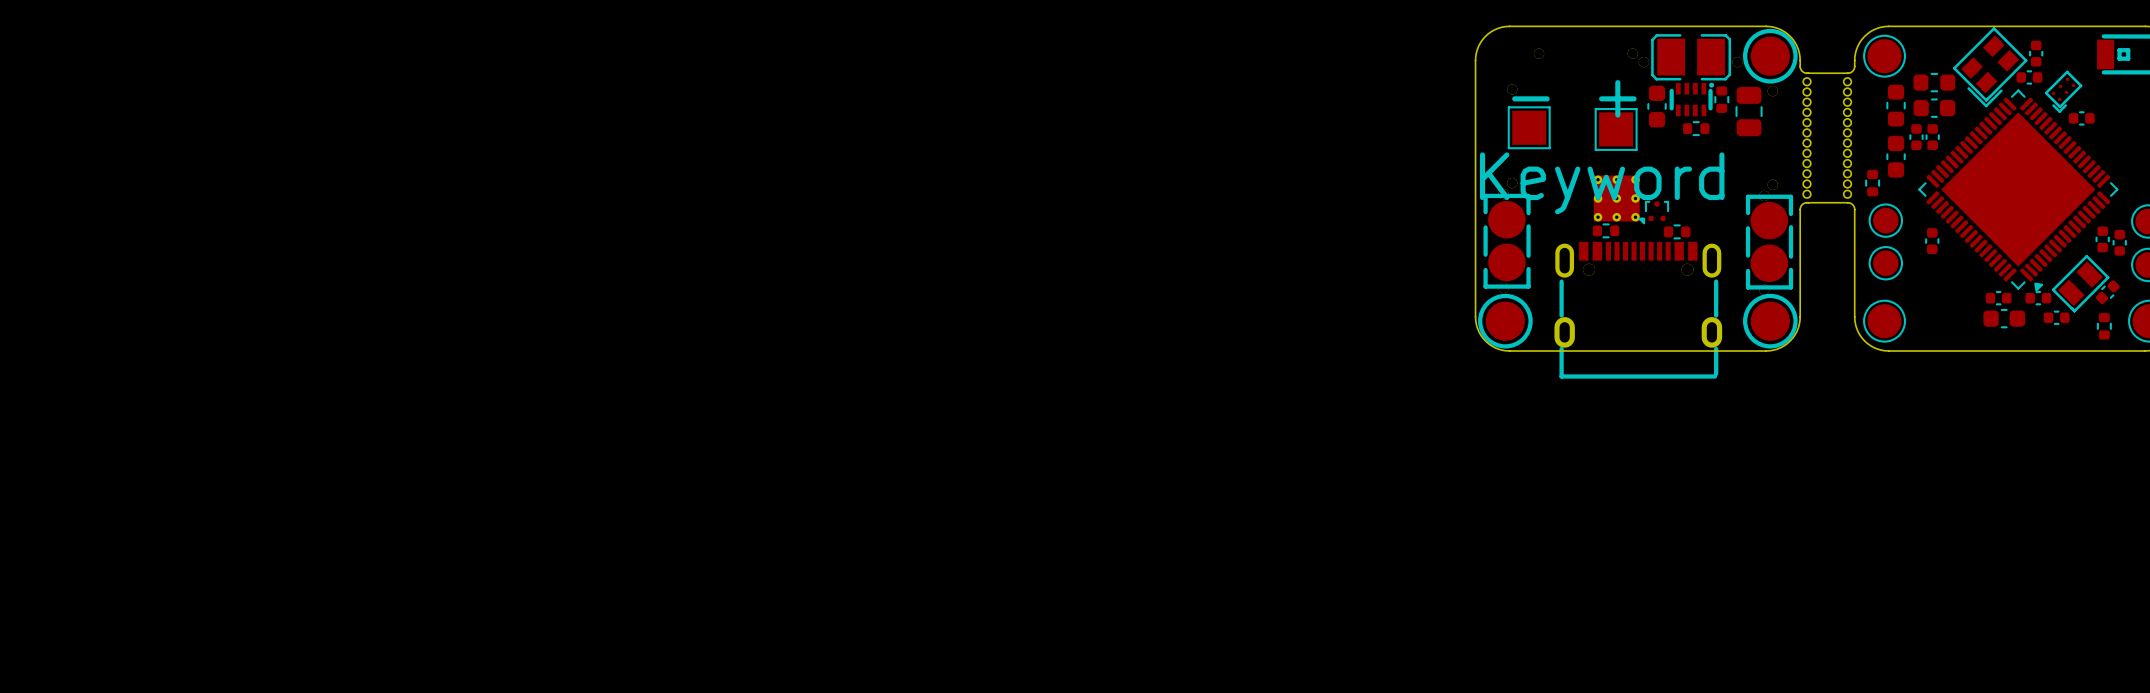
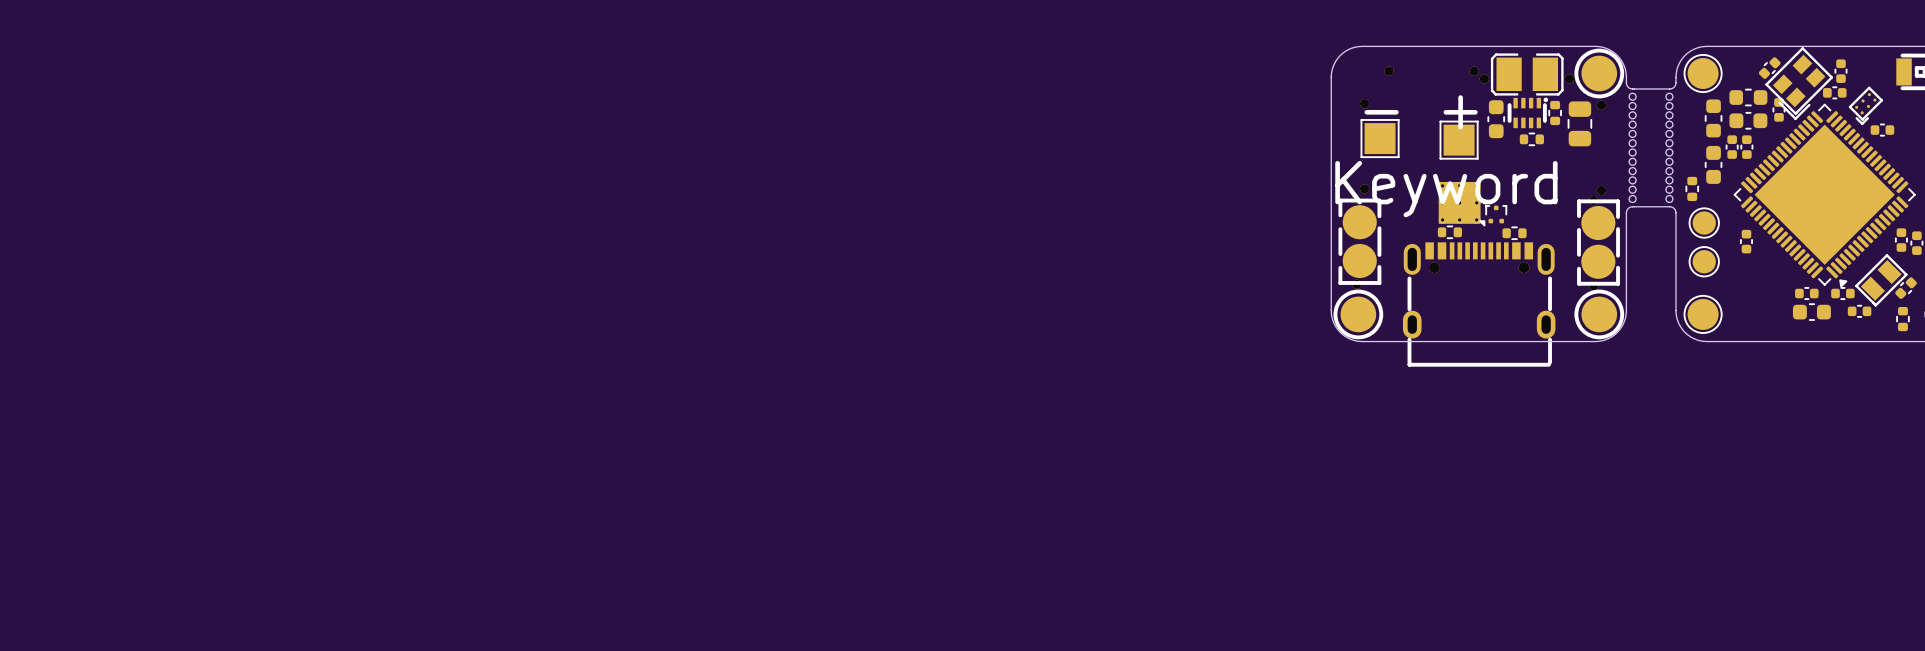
part: none -> (1769, 68)
part: none -> (1779, 109)

